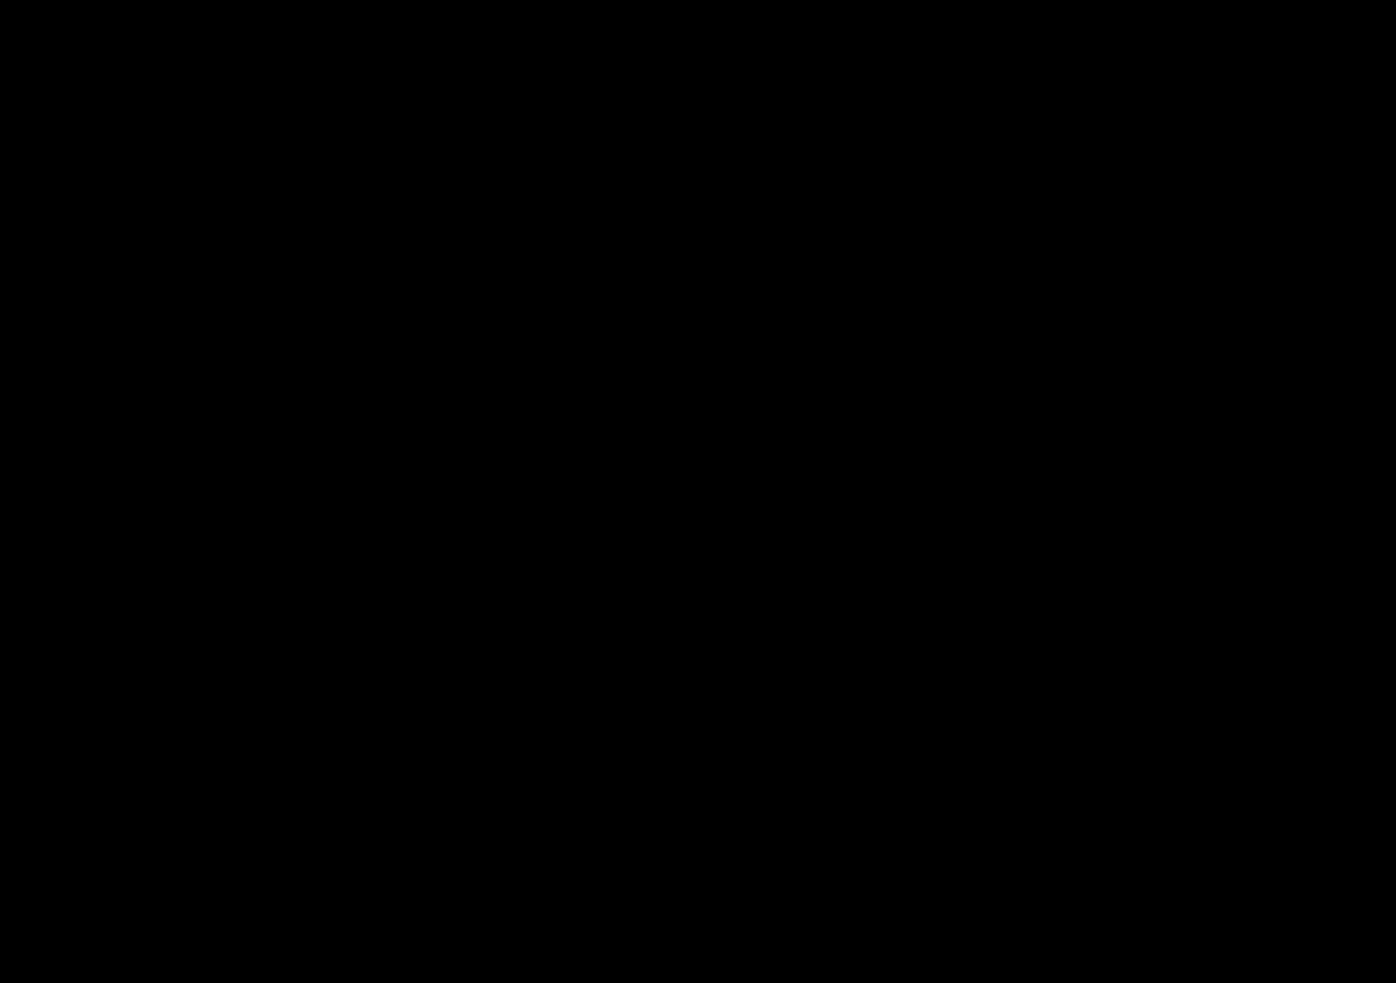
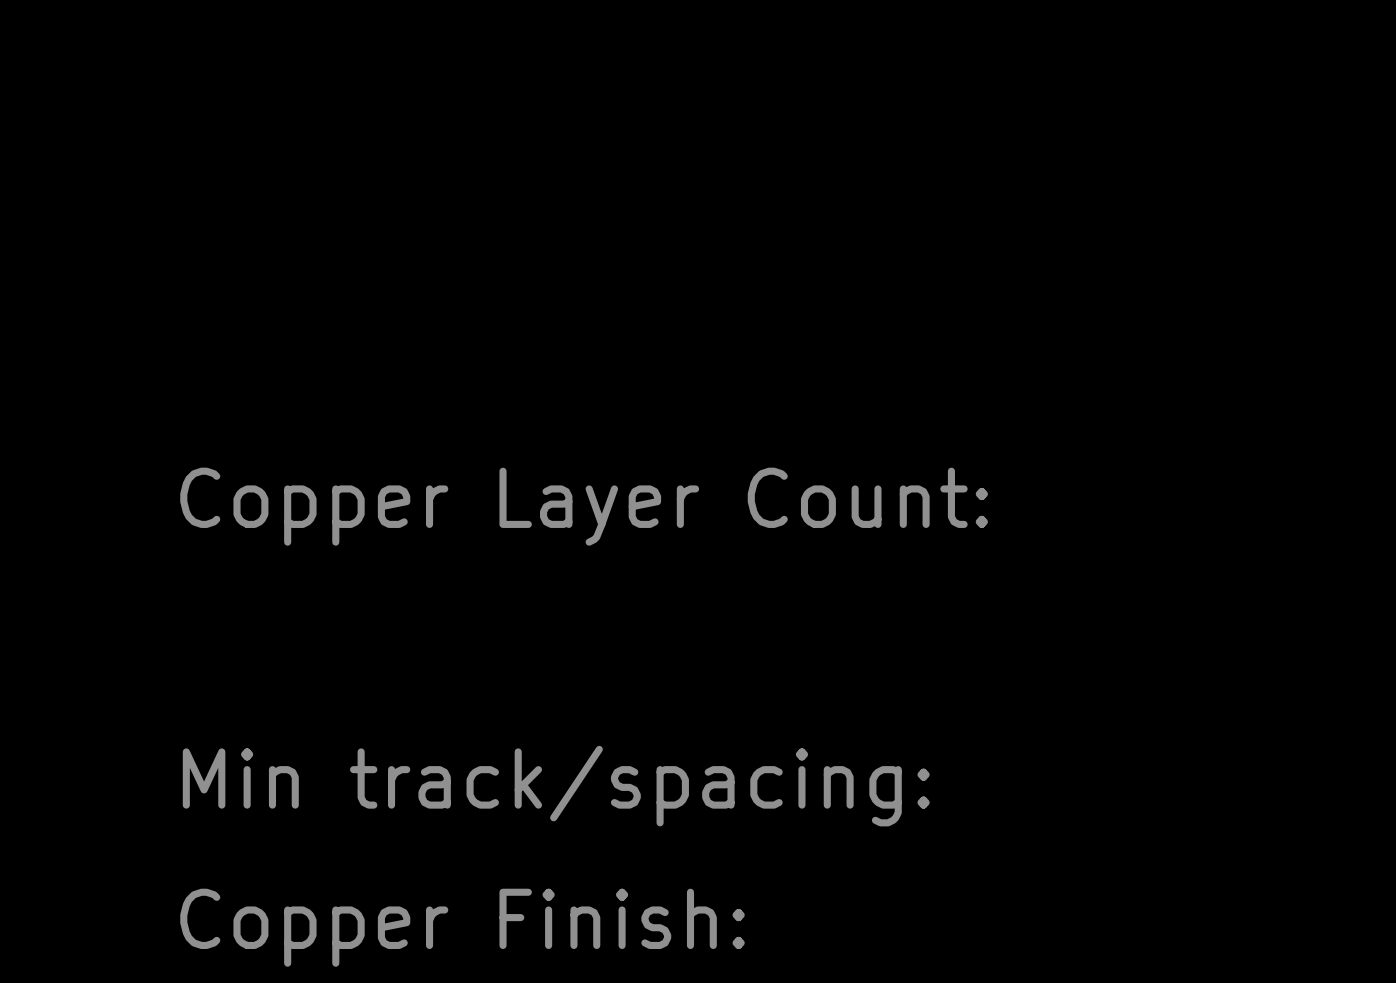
text: none -> Copper Layer Count: (584, 506)
text: none -> Min track/spacing: (556, 786)
text: none -> Copper Finish: (462, 927)

